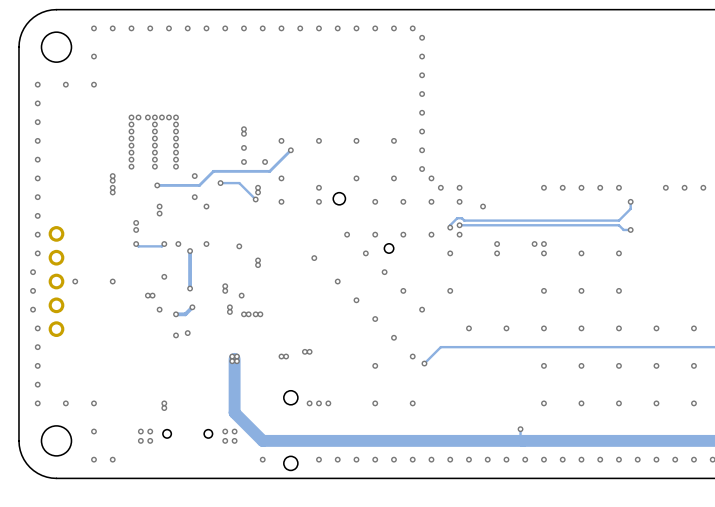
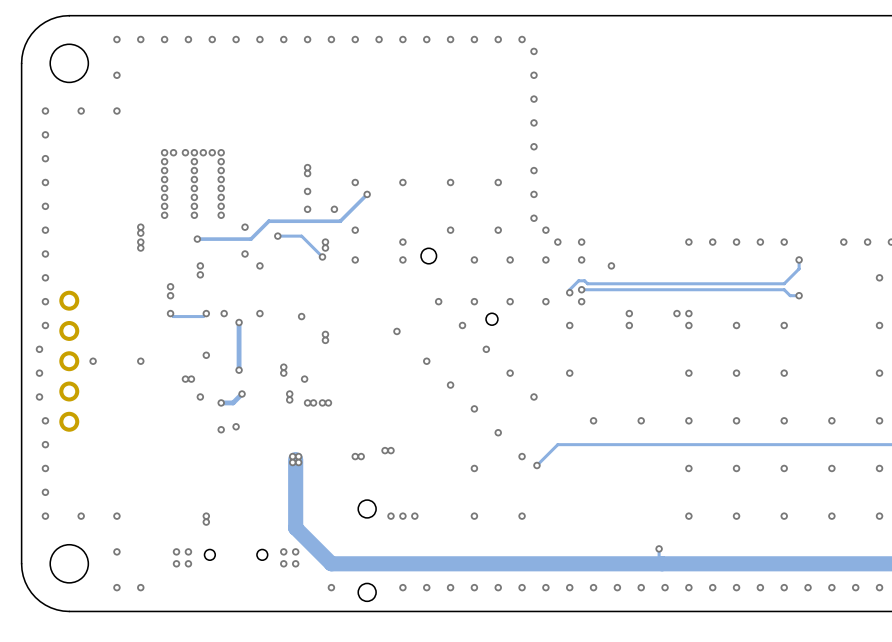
via: none -> (879, 277)
via: none -> (879, 325)
via: none -> (879, 373)

